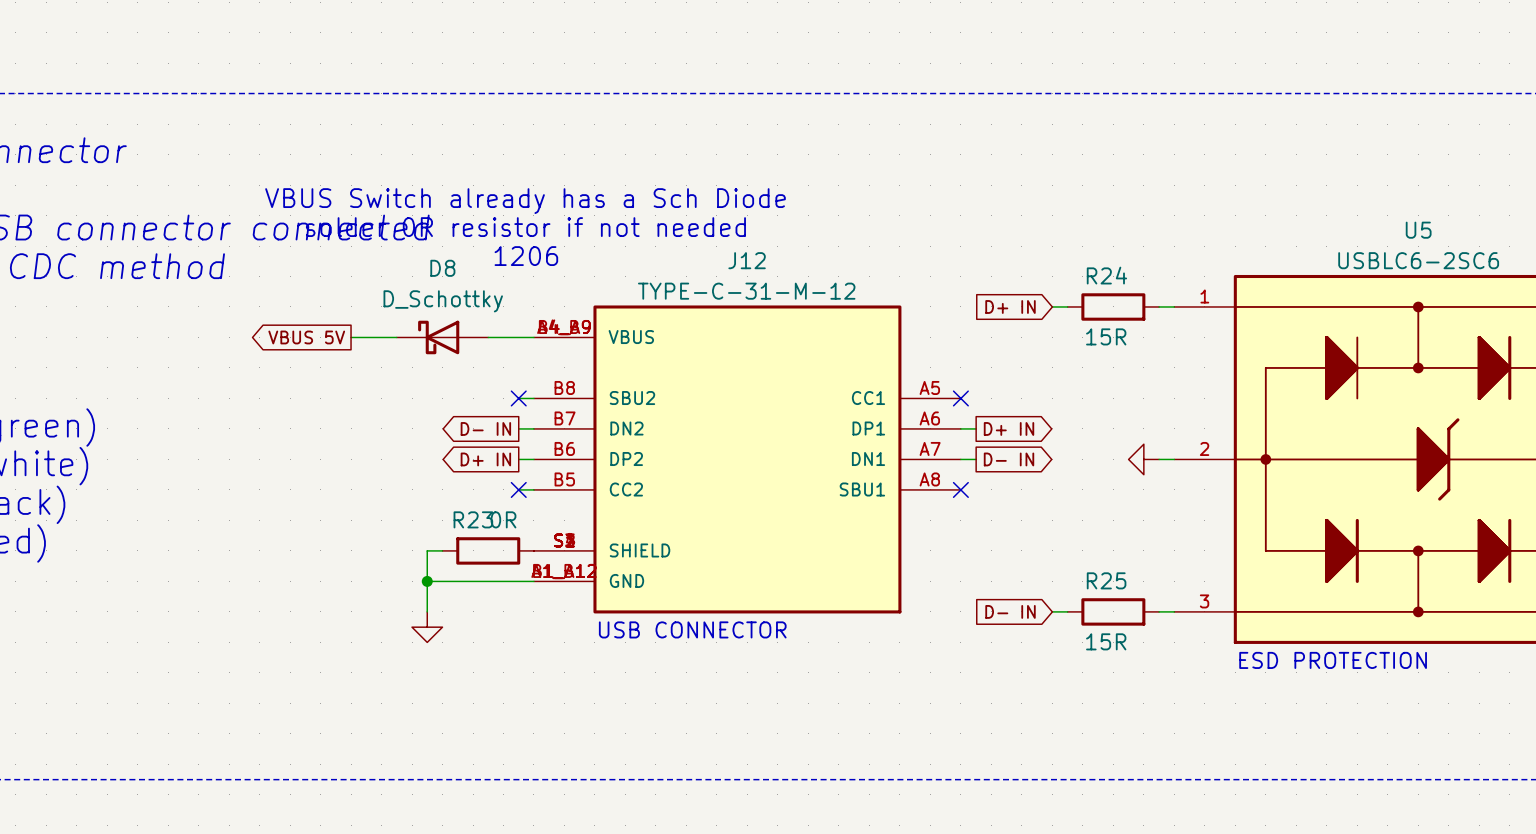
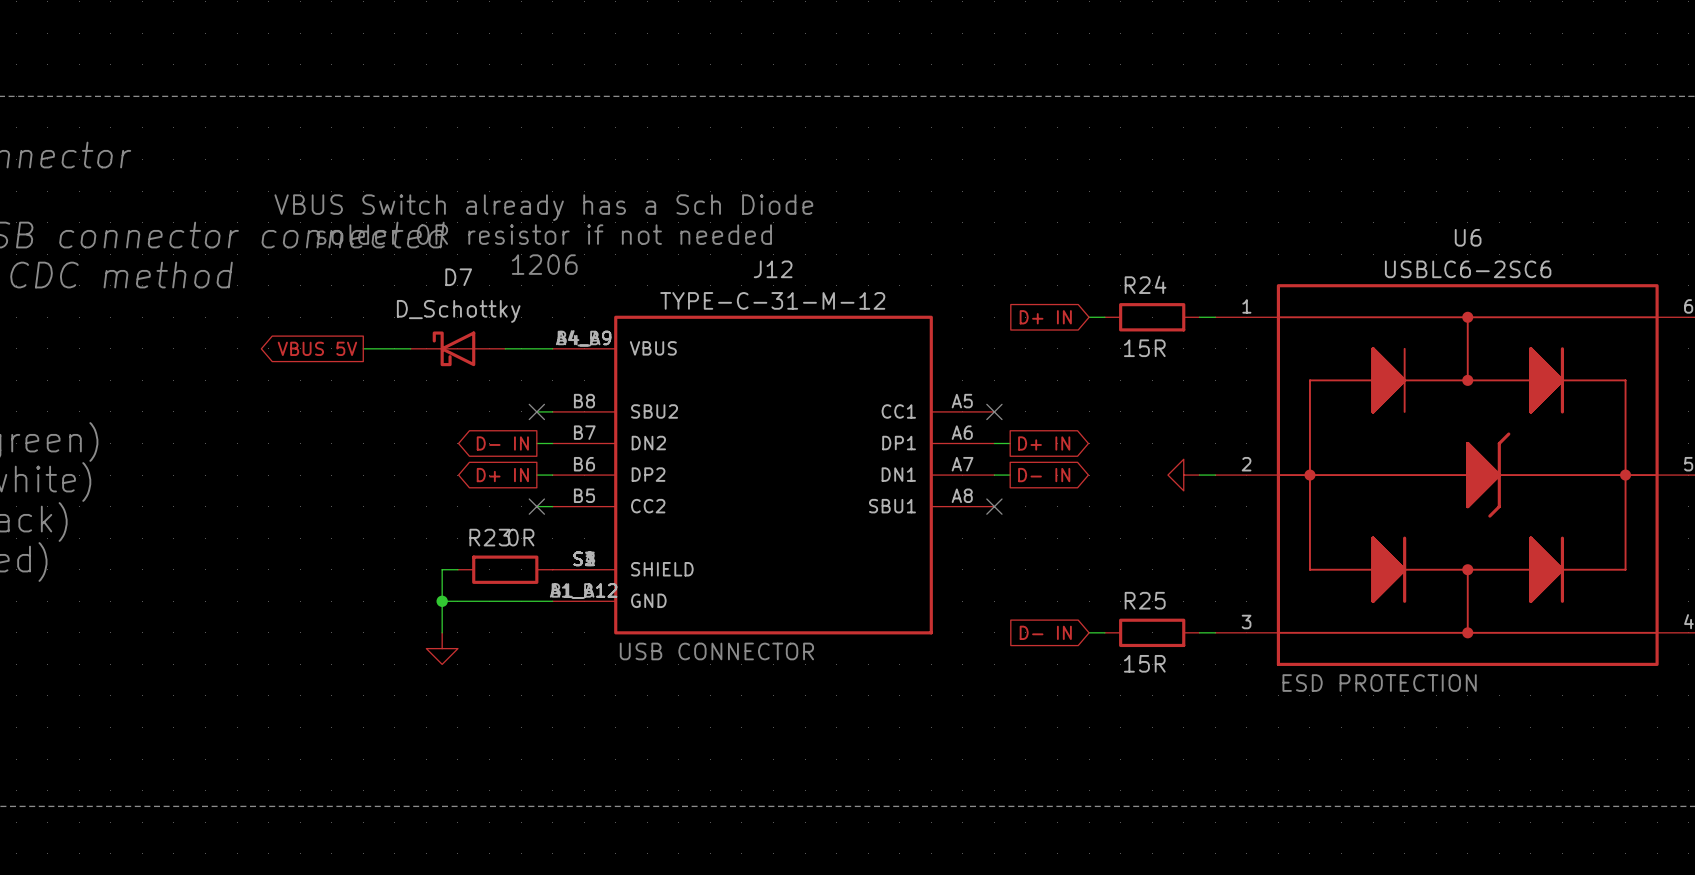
U5 name: U5 (1418, 230) -> U6 (1468, 237)
D8 name: D8 (442, 268) -> D7 (458, 277)

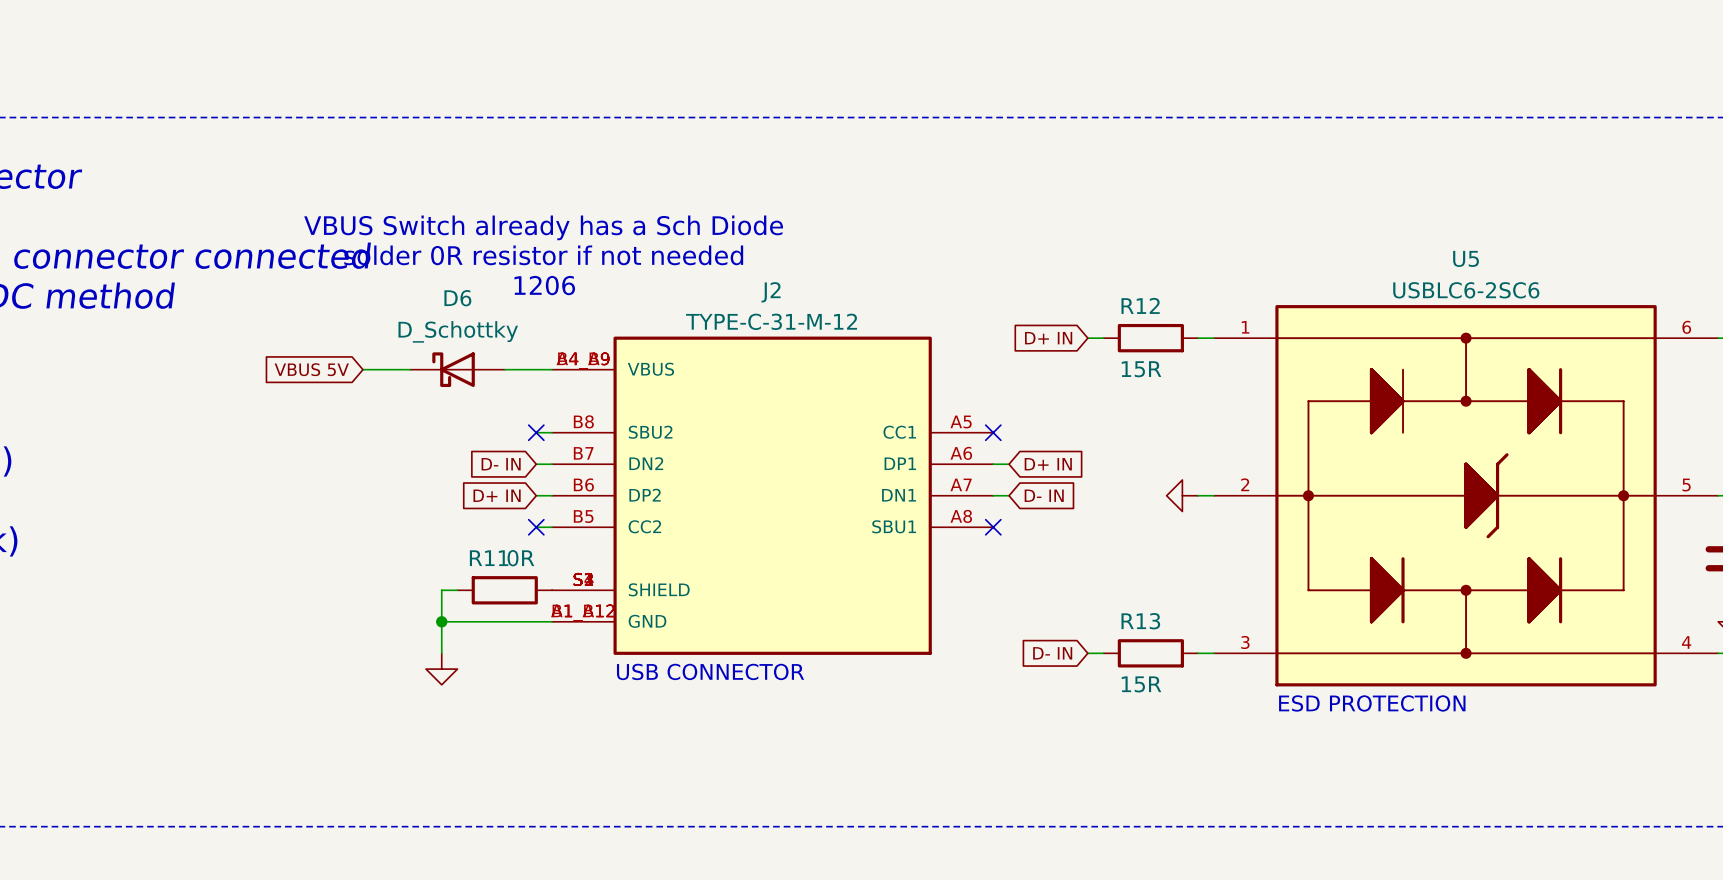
U6 name: U6 (1468, 237) -> U5 (1466, 258)
J12 name: J12 (773, 269) -> J2 (771, 292)
D7 name: D7 (458, 277) -> D6 (457, 298)
R24 name: R24 (1145, 284) -> R12 (1140, 305)
global label shape: output (317, 348) -> input (311, 369)
global label shape: output (502, 443) -> input (501, 464)
global label shape: output (1044, 443) -> input (1048, 464)
global label shape: output (502, 475) -> input (497, 495)
global label shape: output (1044, 475) -> input (1044, 495)
R23 name: R23 (489, 537) -> R11 (489, 558)
R25 name: R25 (1145, 600) -> R13 (1140, 621)

